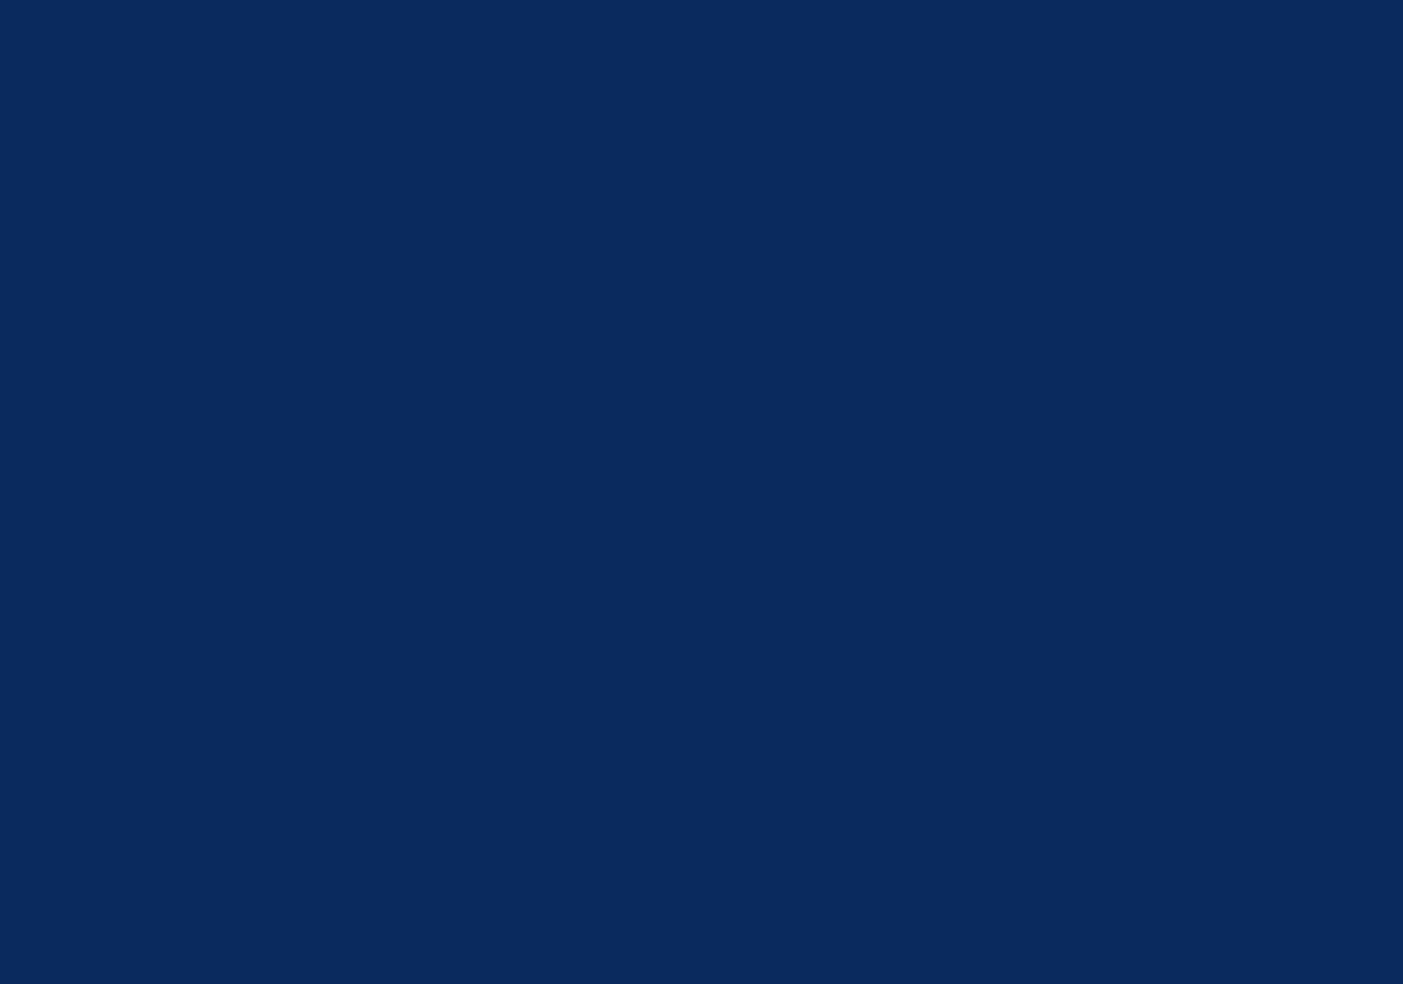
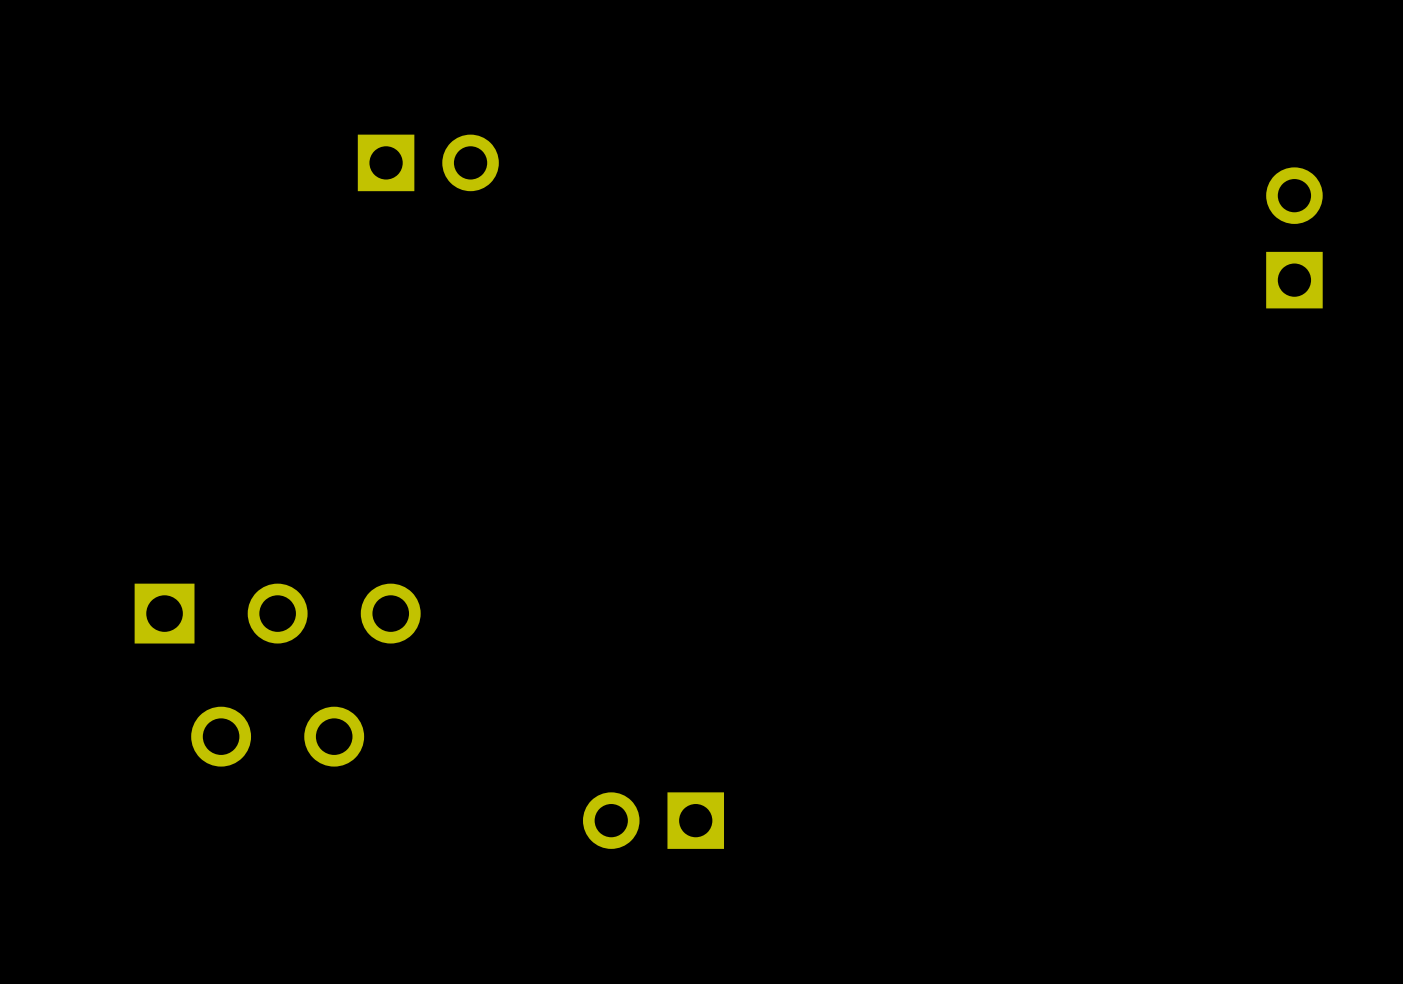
part: none -> (428, 162)
part: none -> (1294, 237)
part: none -> (277, 675)
part: none -> (653, 820)

